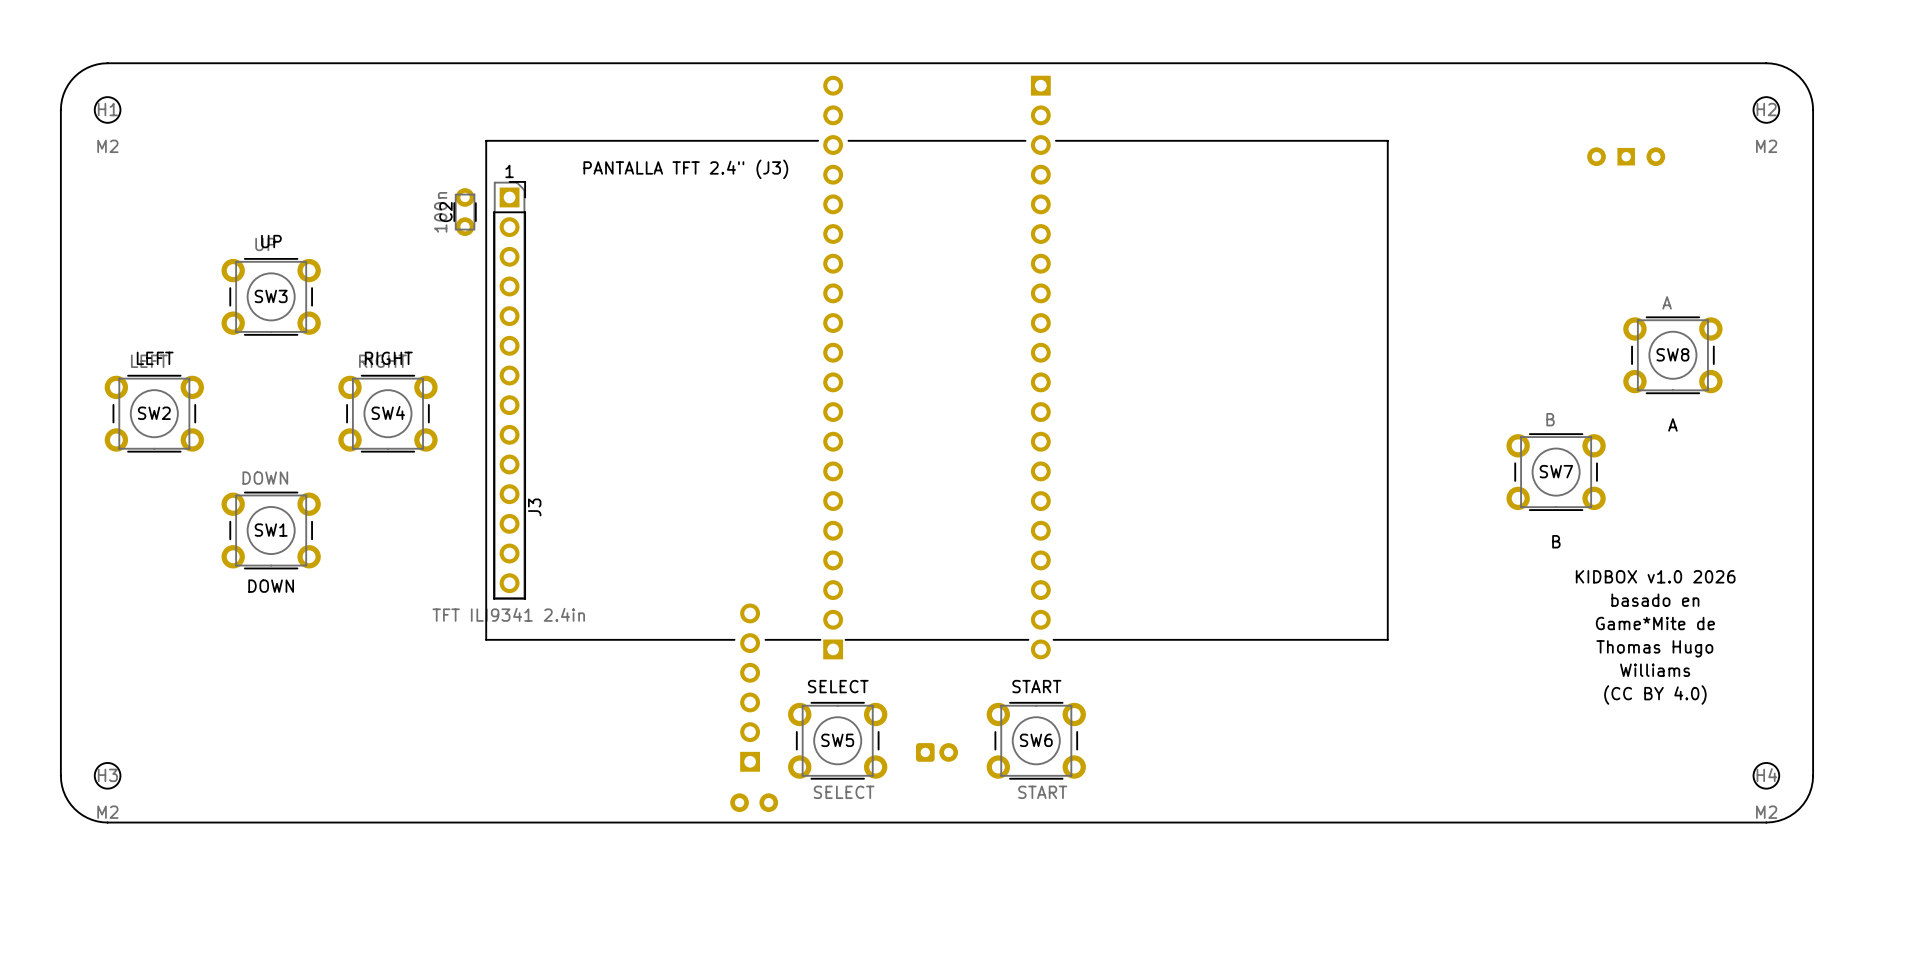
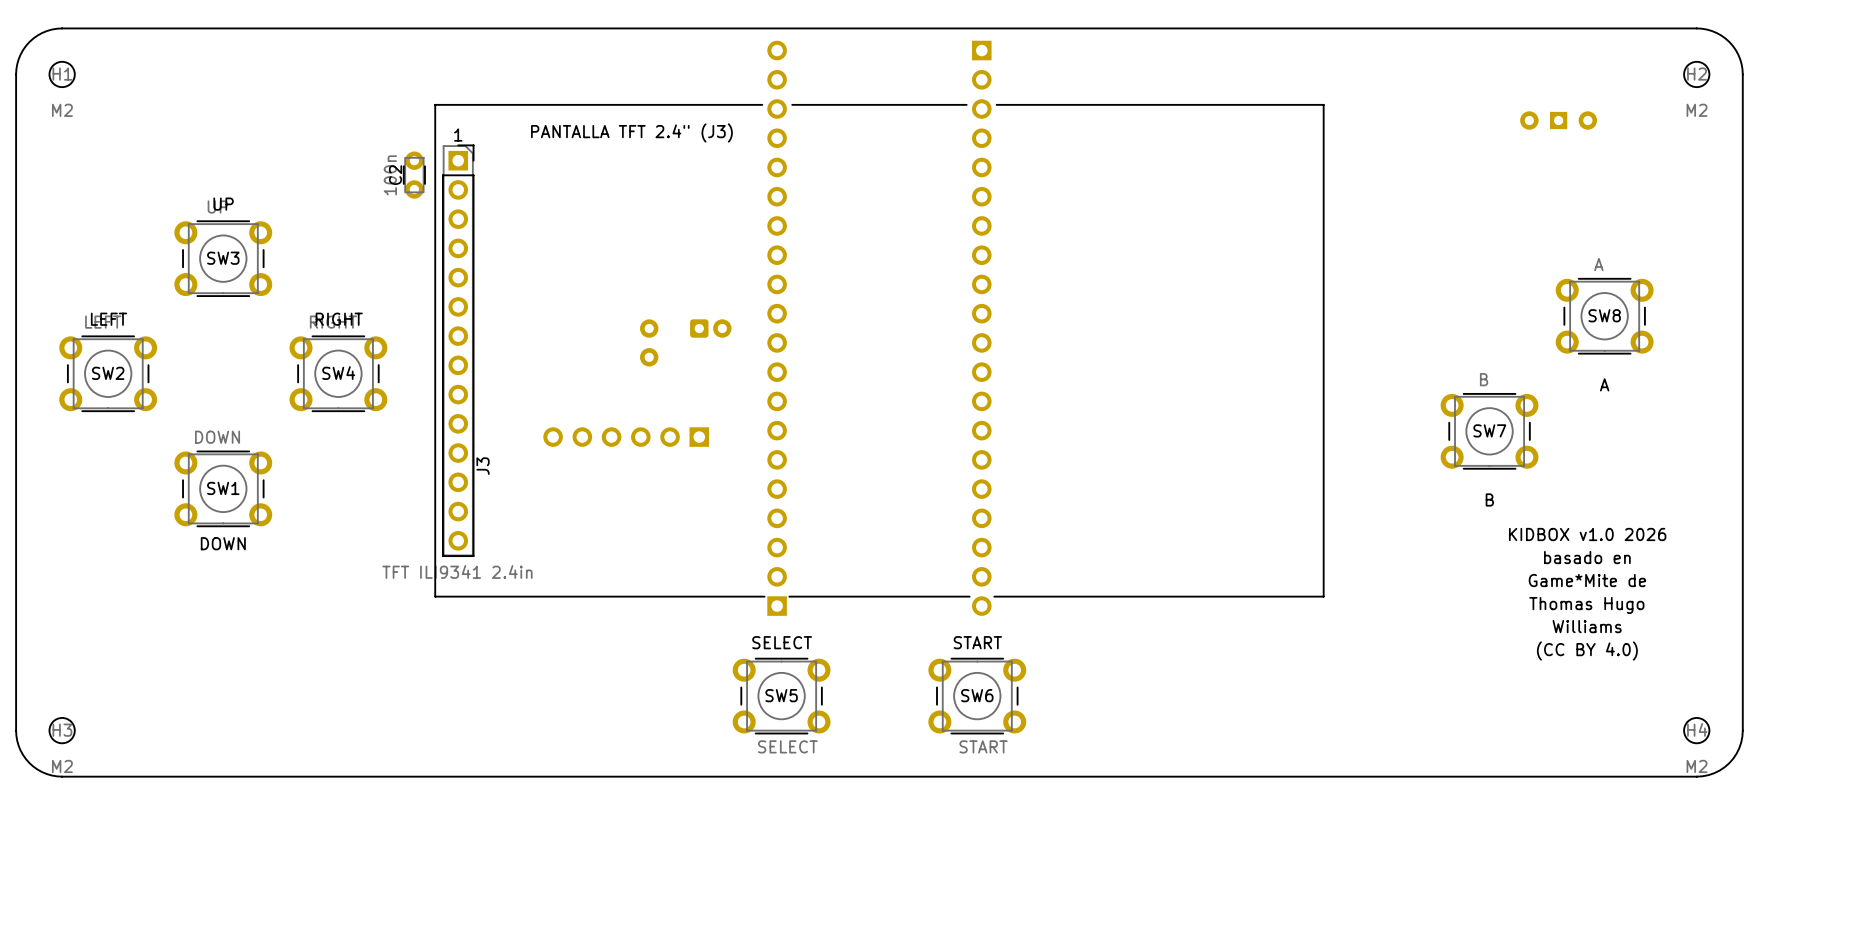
part: none -> (710, 328)
part: none -> (649, 342)
line: none -> (679, 596) (710, 596)
part rotation: 0° (750, 687) -> 90° counterclockwise (626, 437)
part position: (750, 687) -> (626, 437)
part: (936, 752) -> none
part: (754, 802) -> none

